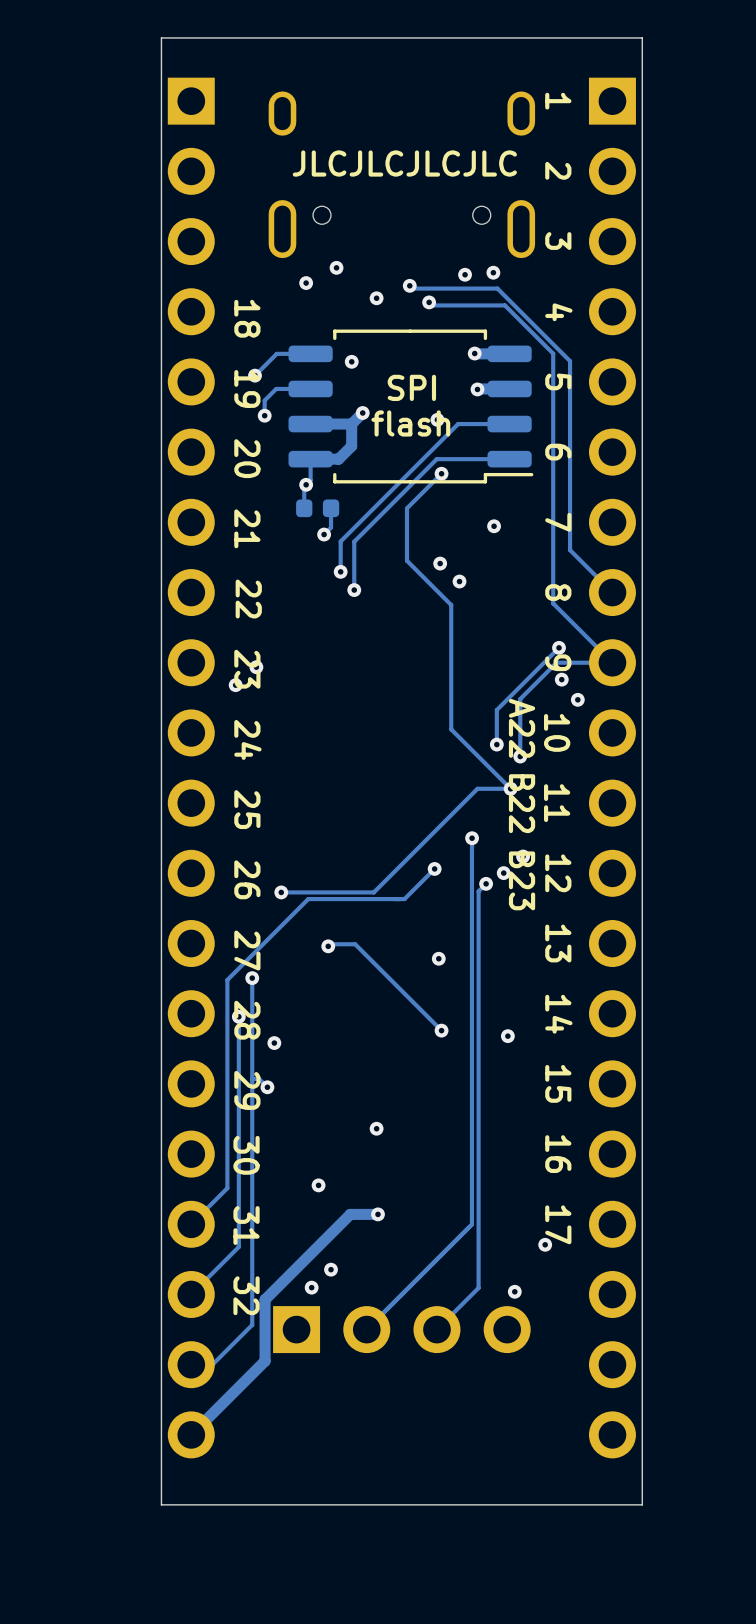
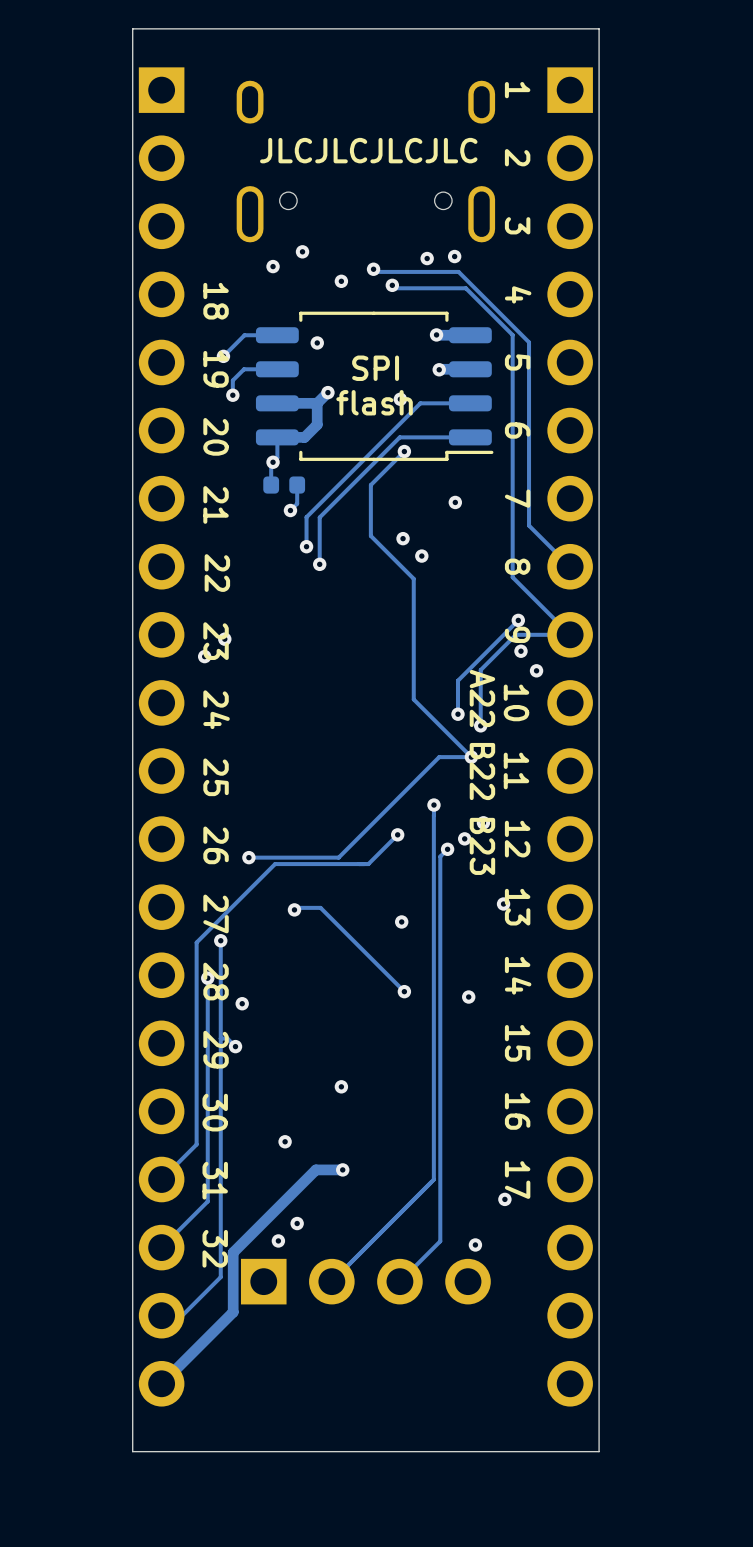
via: none -> (503, 904)

